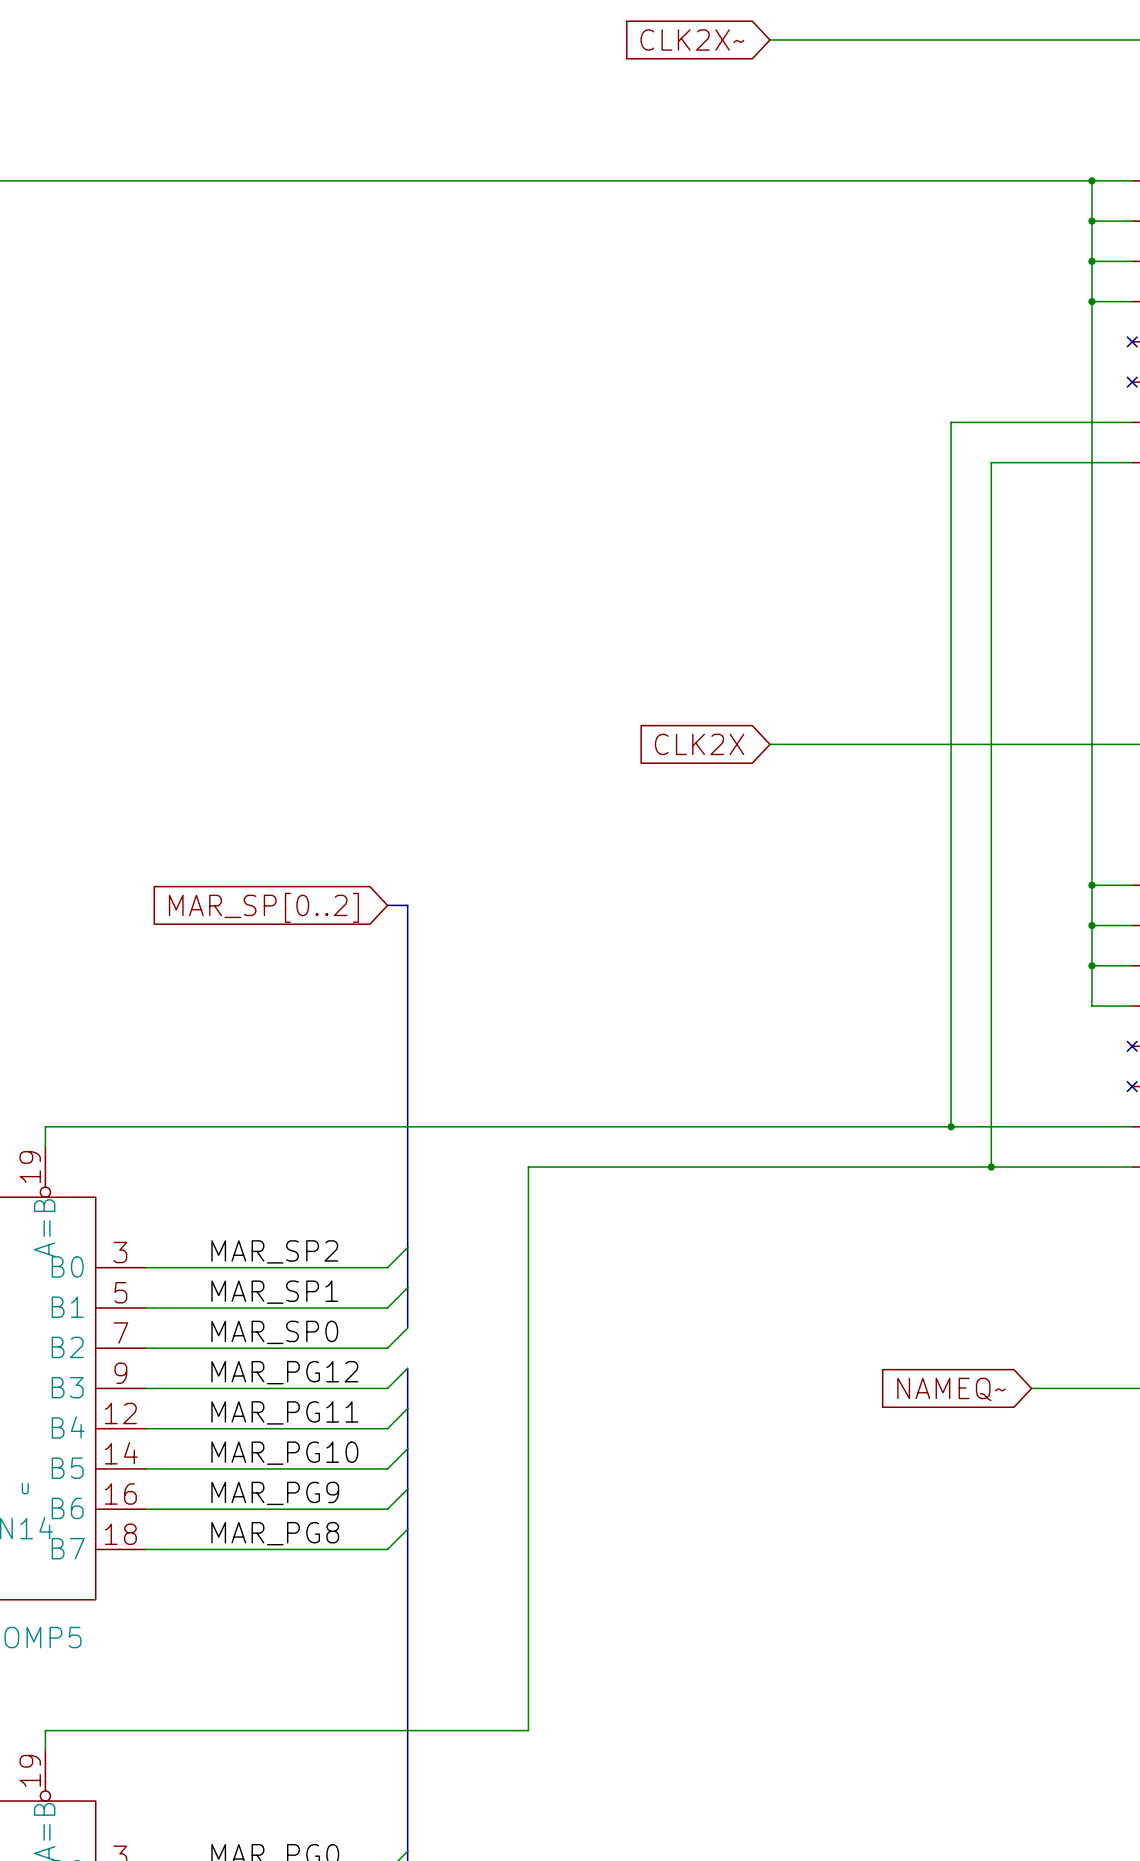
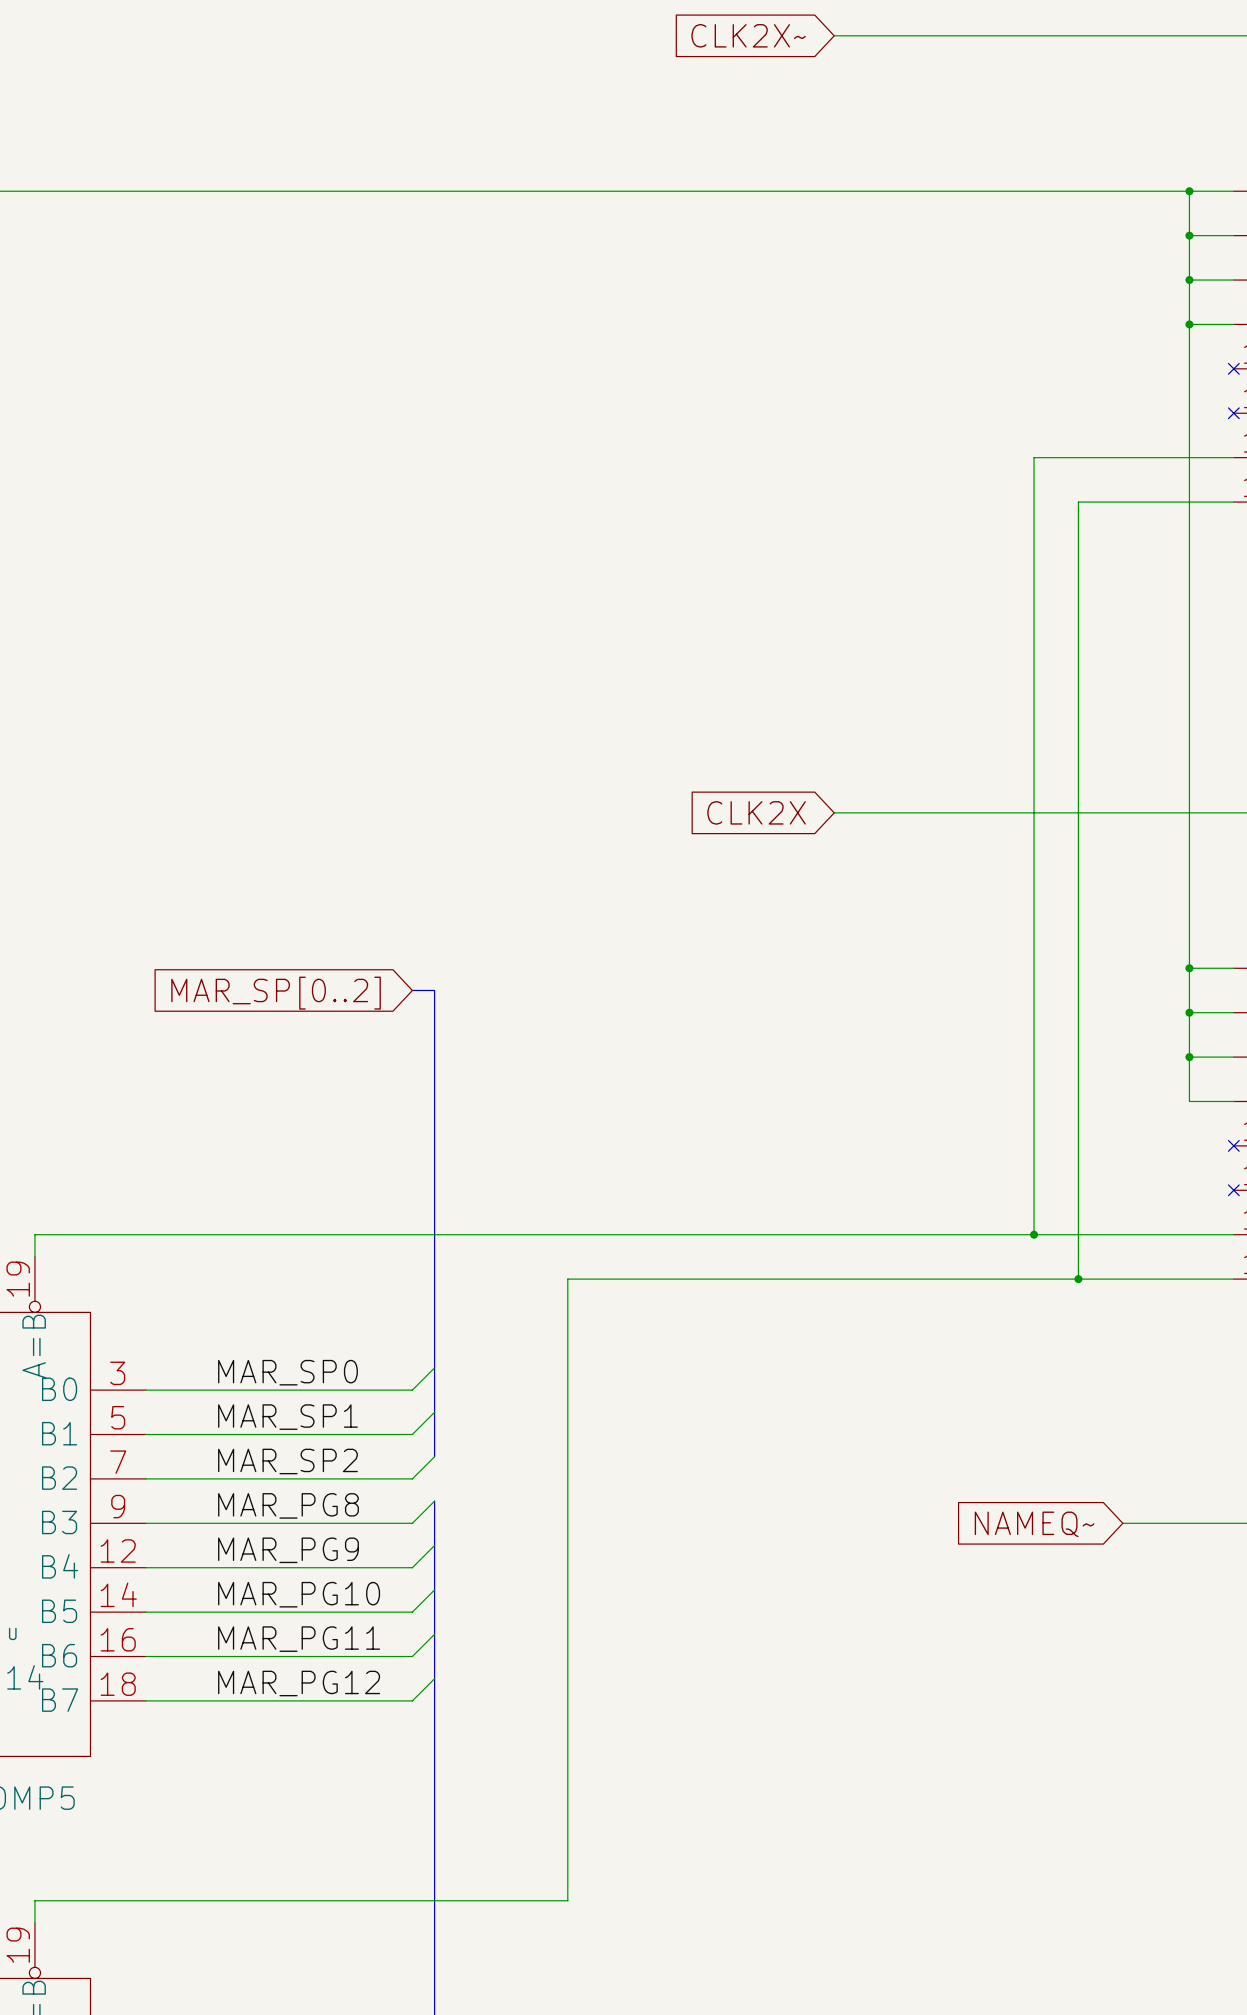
label: MAR_SP2 (274, 1251) -> MAR_SP0 (287, 1372)
label: MAR_SP0 (274, 1332) -> MAR_SP2 (287, 1461)
label: MAR_PG12 (284, 1372) -> MAR_PG8 (288, 1505)
label: MAR_PG11 (284, 1412) -> MAR_PG9 (288, 1550)
label: MAR_PG9 (275, 1493) -> MAR_PG11 (299, 1639)
label: MAR_PG8 (275, 1533) -> MAR_PG12 (299, 1683)

